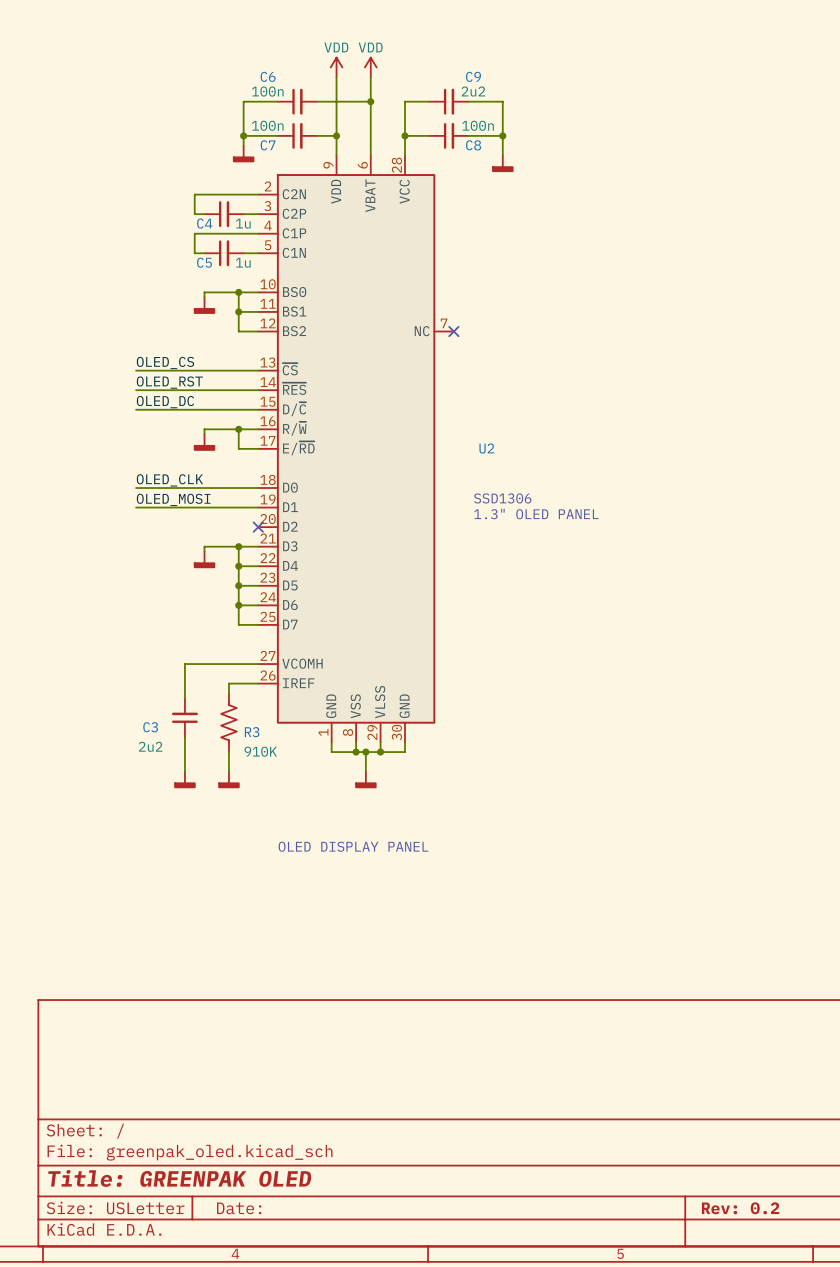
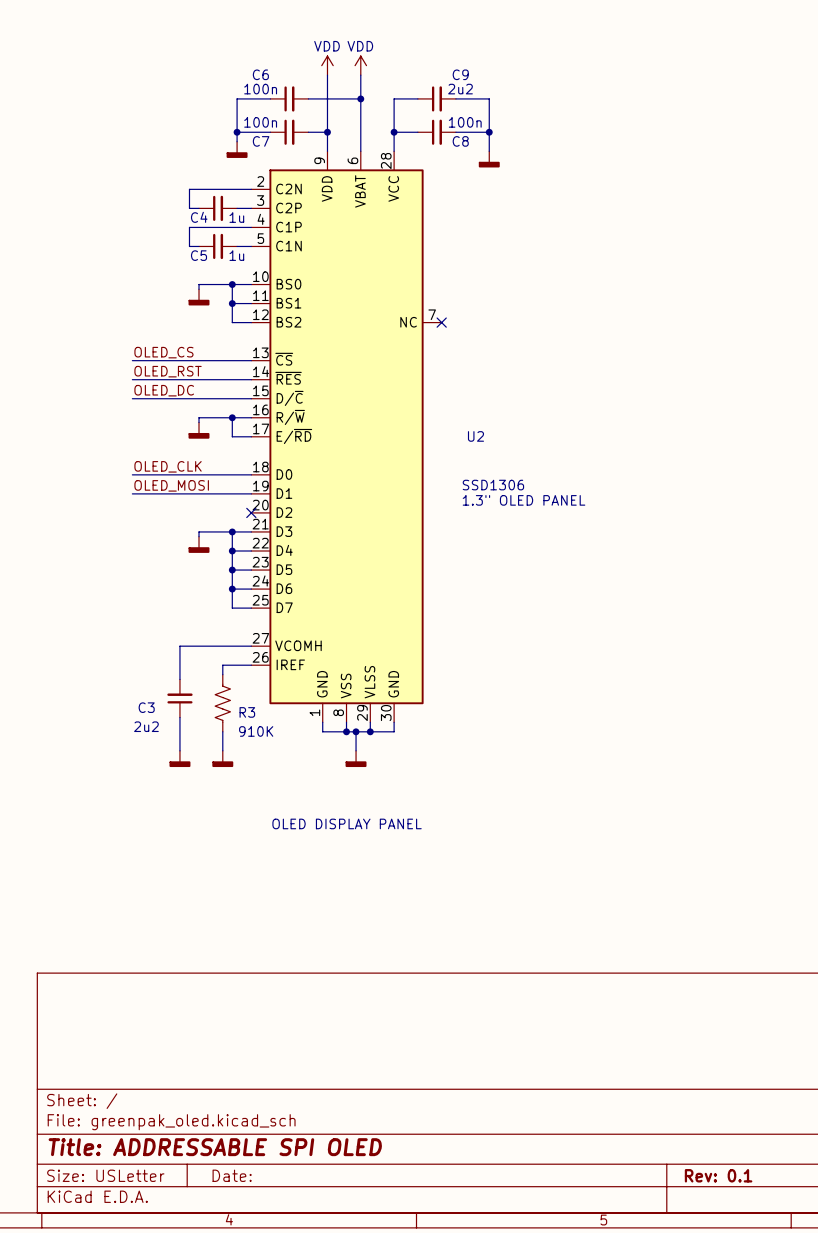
title block: Title: GREENPAK OLED (179, 1178) -> Title: ADDRESSABLE SPI OLED (215, 1147)
title block: Rev: 0.2 (740, 1208) -> Rev: 0.1 (718, 1175)

